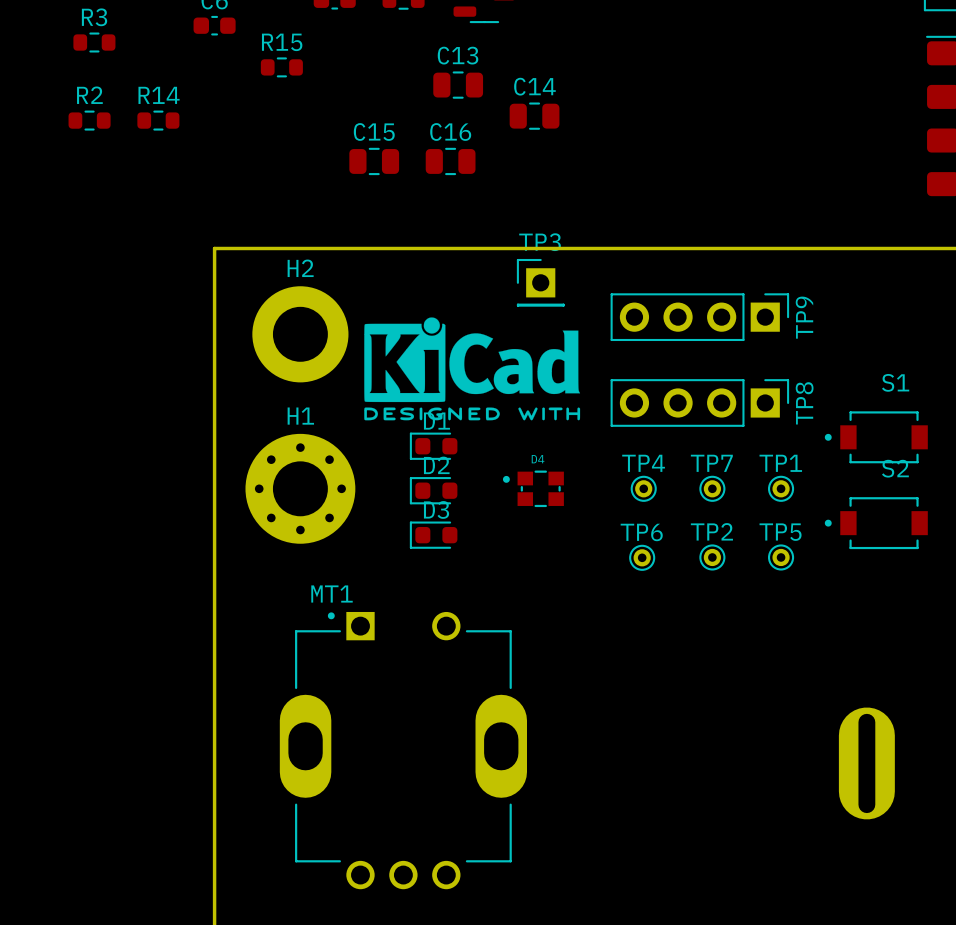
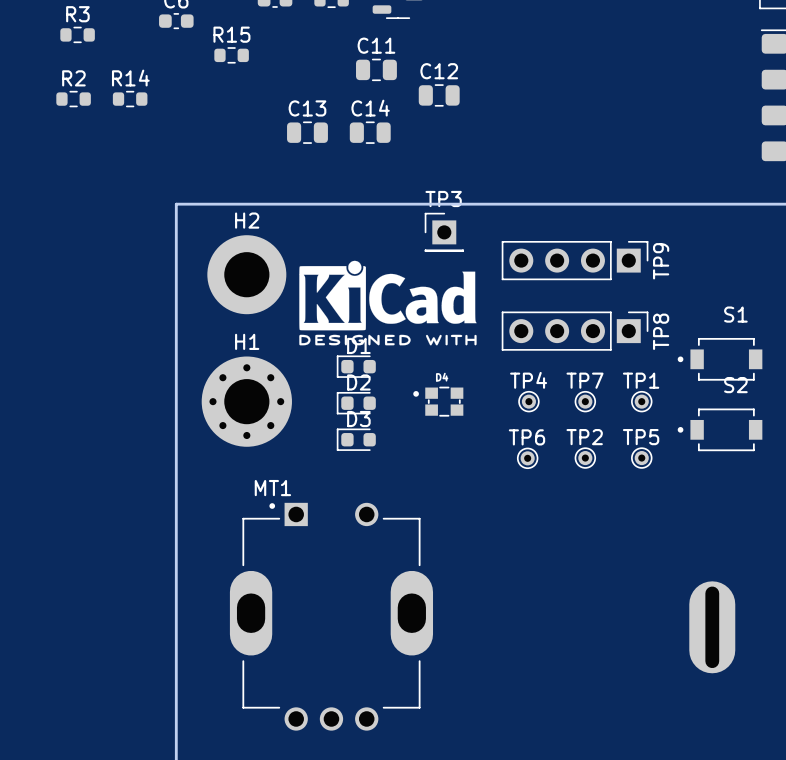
C13 name: C13 (458, 55) -> C11 (376, 45)
C14 name: C14 (534, 86) -> C12 (439, 71)
C15 name: C15 (374, 131) -> C13 (307, 108)
C16 name: C16 (450, 131) -> C14 (370, 108)

